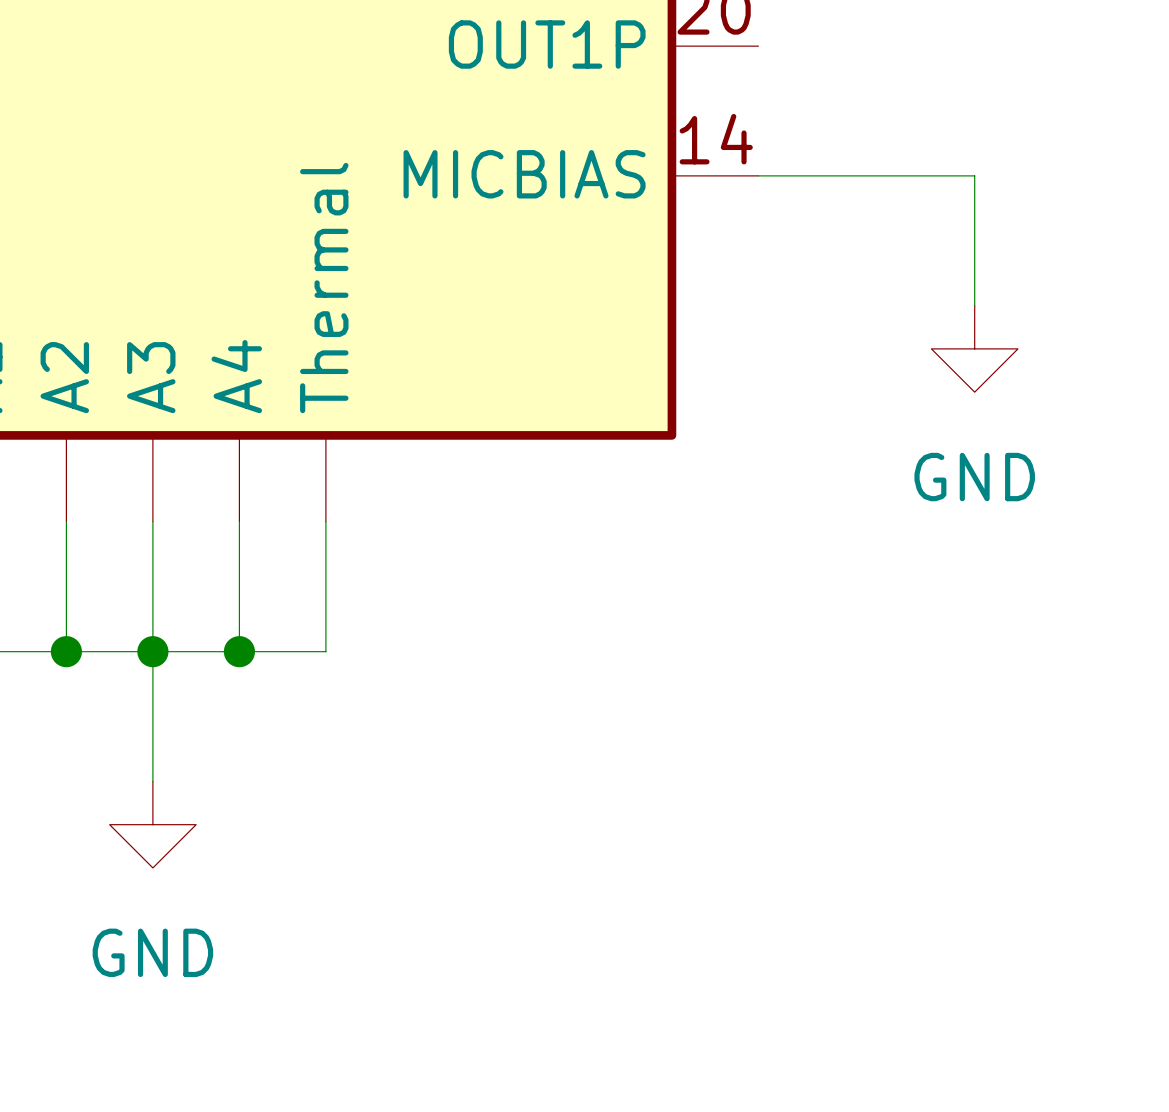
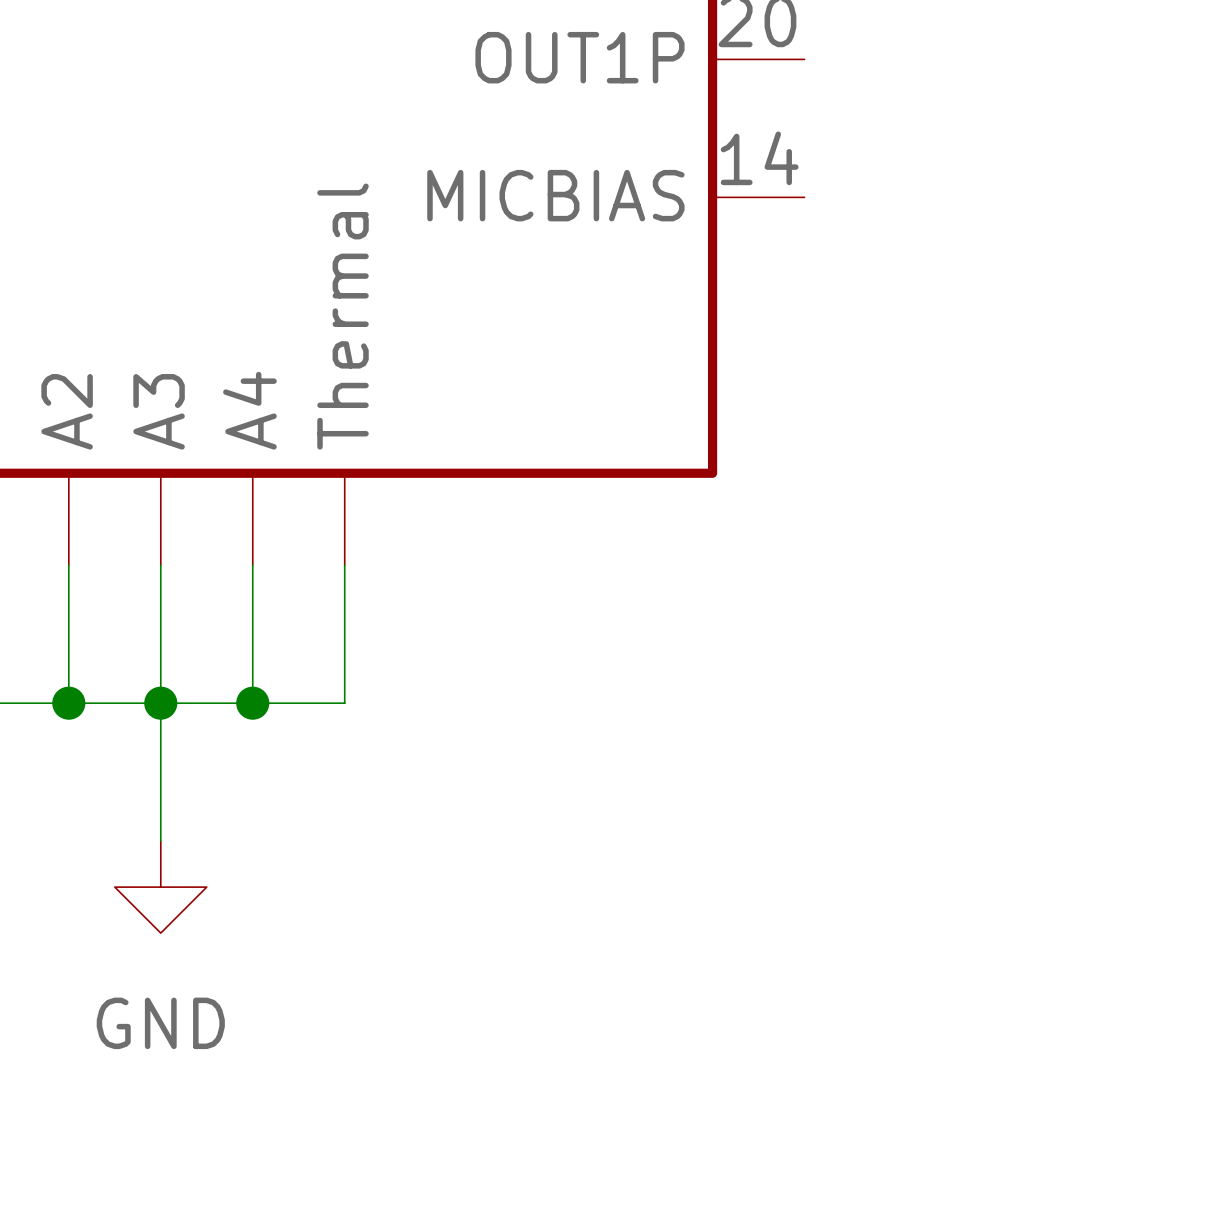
wire: (758, 175) (974, 175) (974, 305) -> none
power symbol: GND (974, 348) -> none

